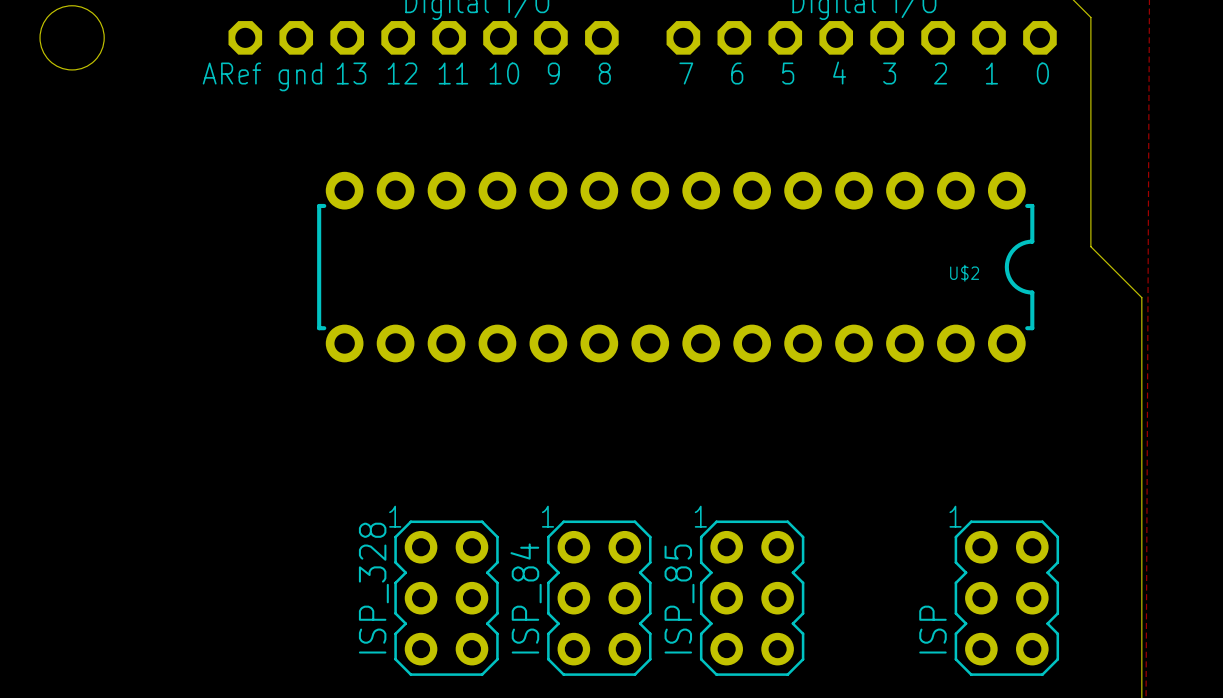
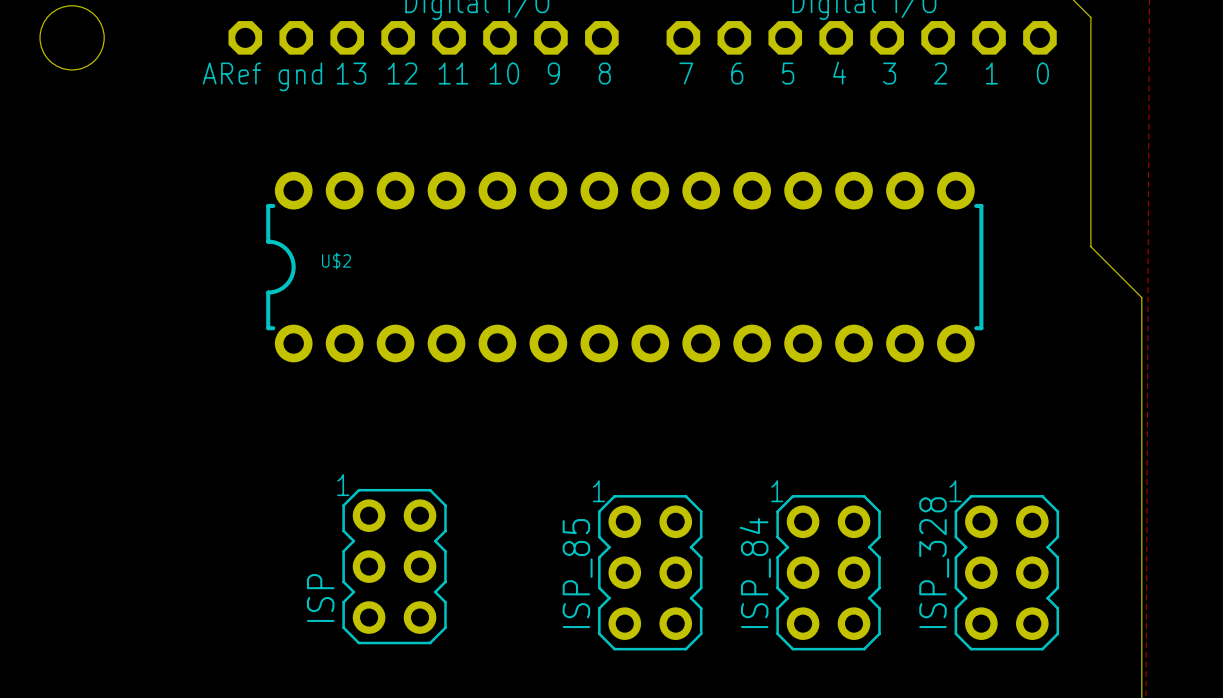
U$2 rotation: 0° (675, 267) -> 180° (624, 267)
ISP: none -> (394, 566)
ISP_328 position: (446, 598) -> (1006, 572)
ISP_84 position: (599, 598) -> (828, 572)
ISP_85 position: (752, 598) -> (650, 572)
ISP: (1006, 598) -> none

